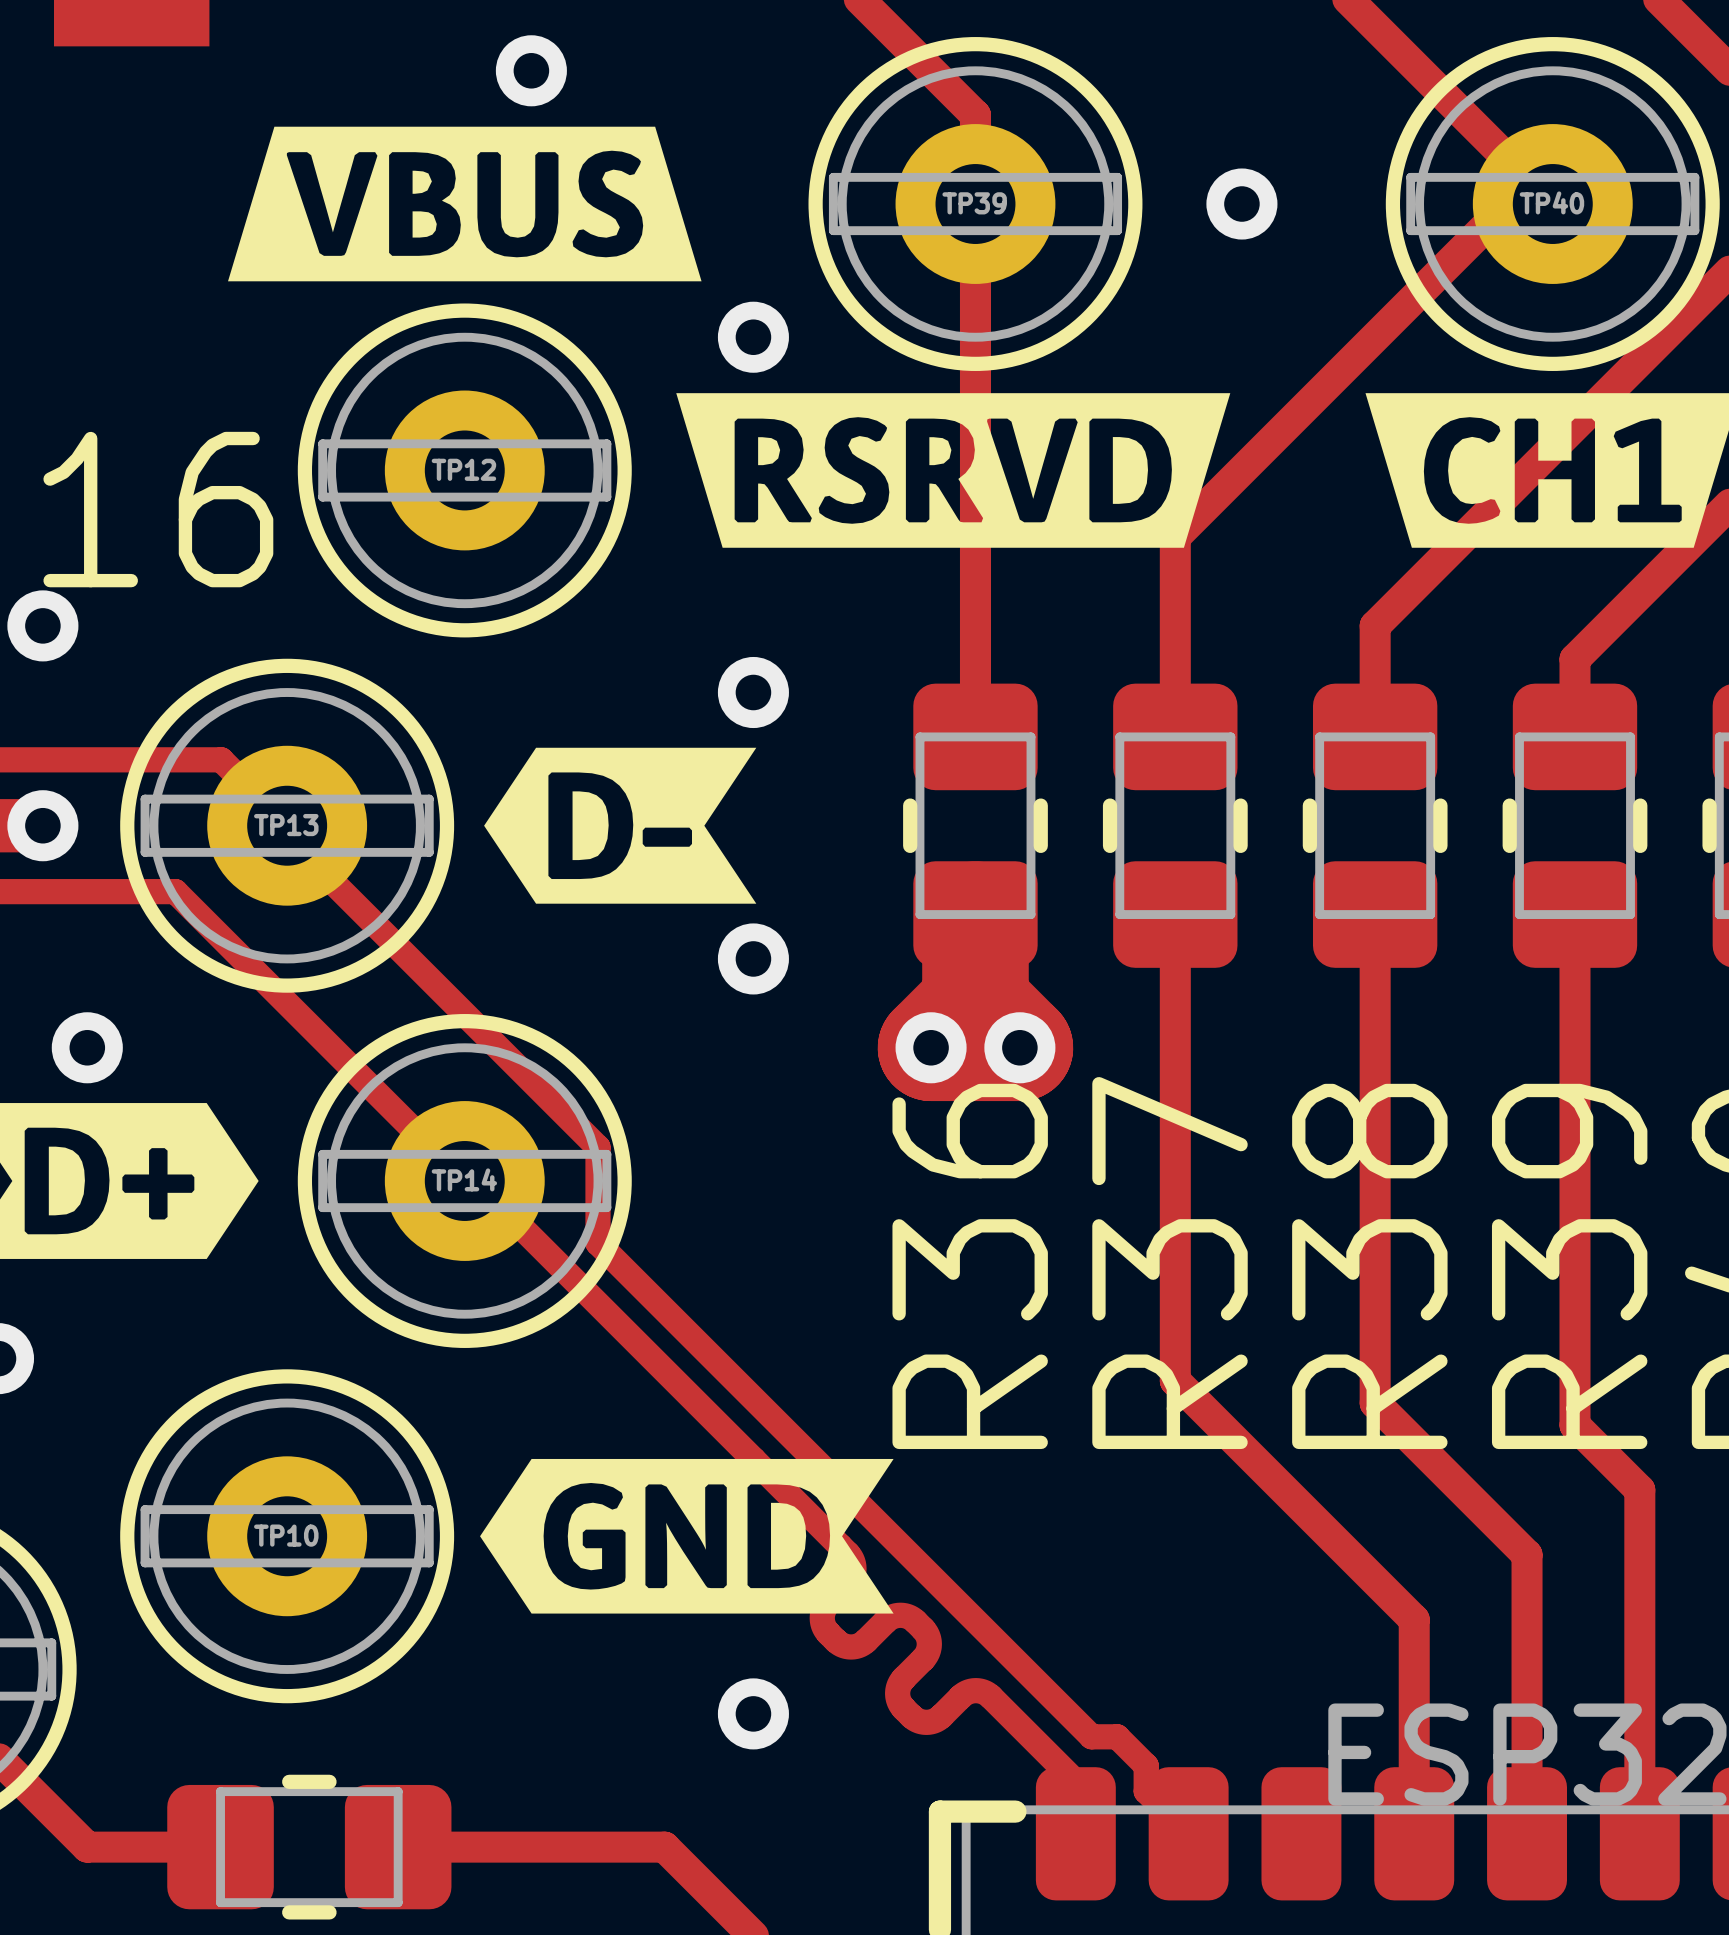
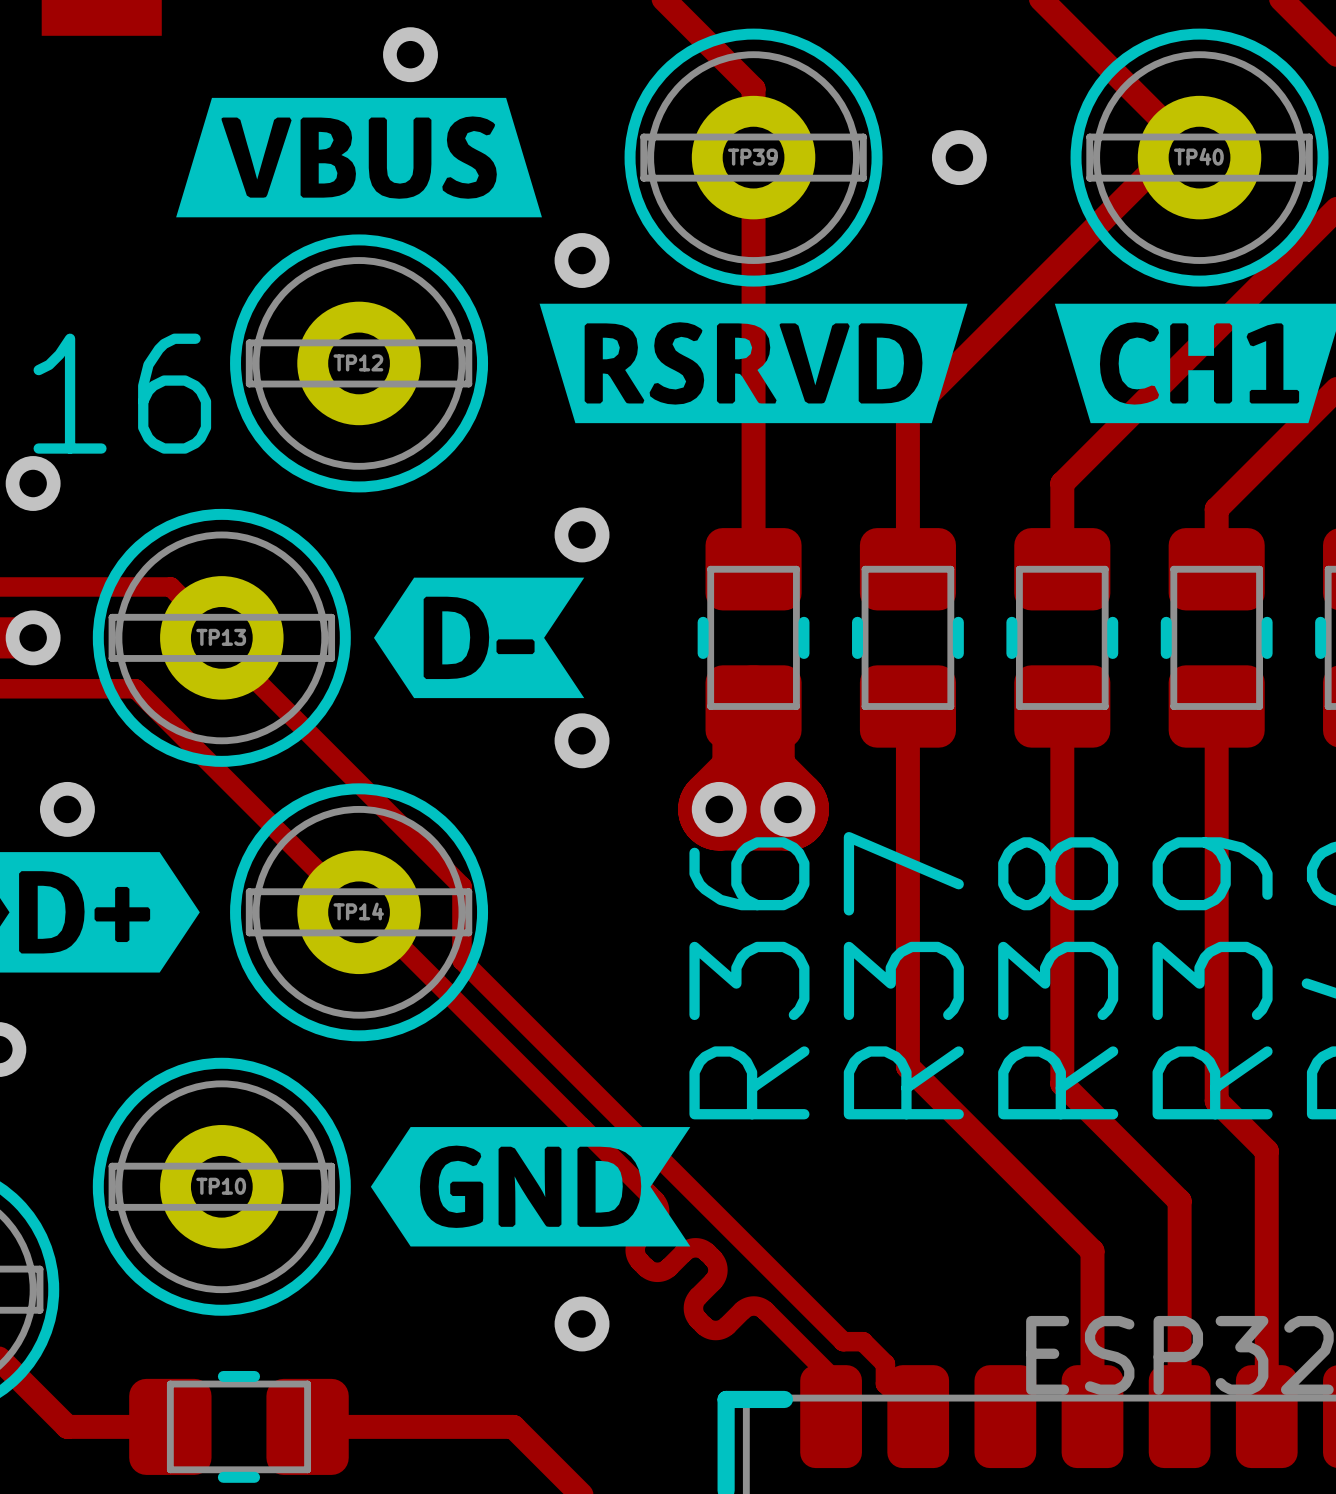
drawing position: (953, 470) -> (753, 363)

